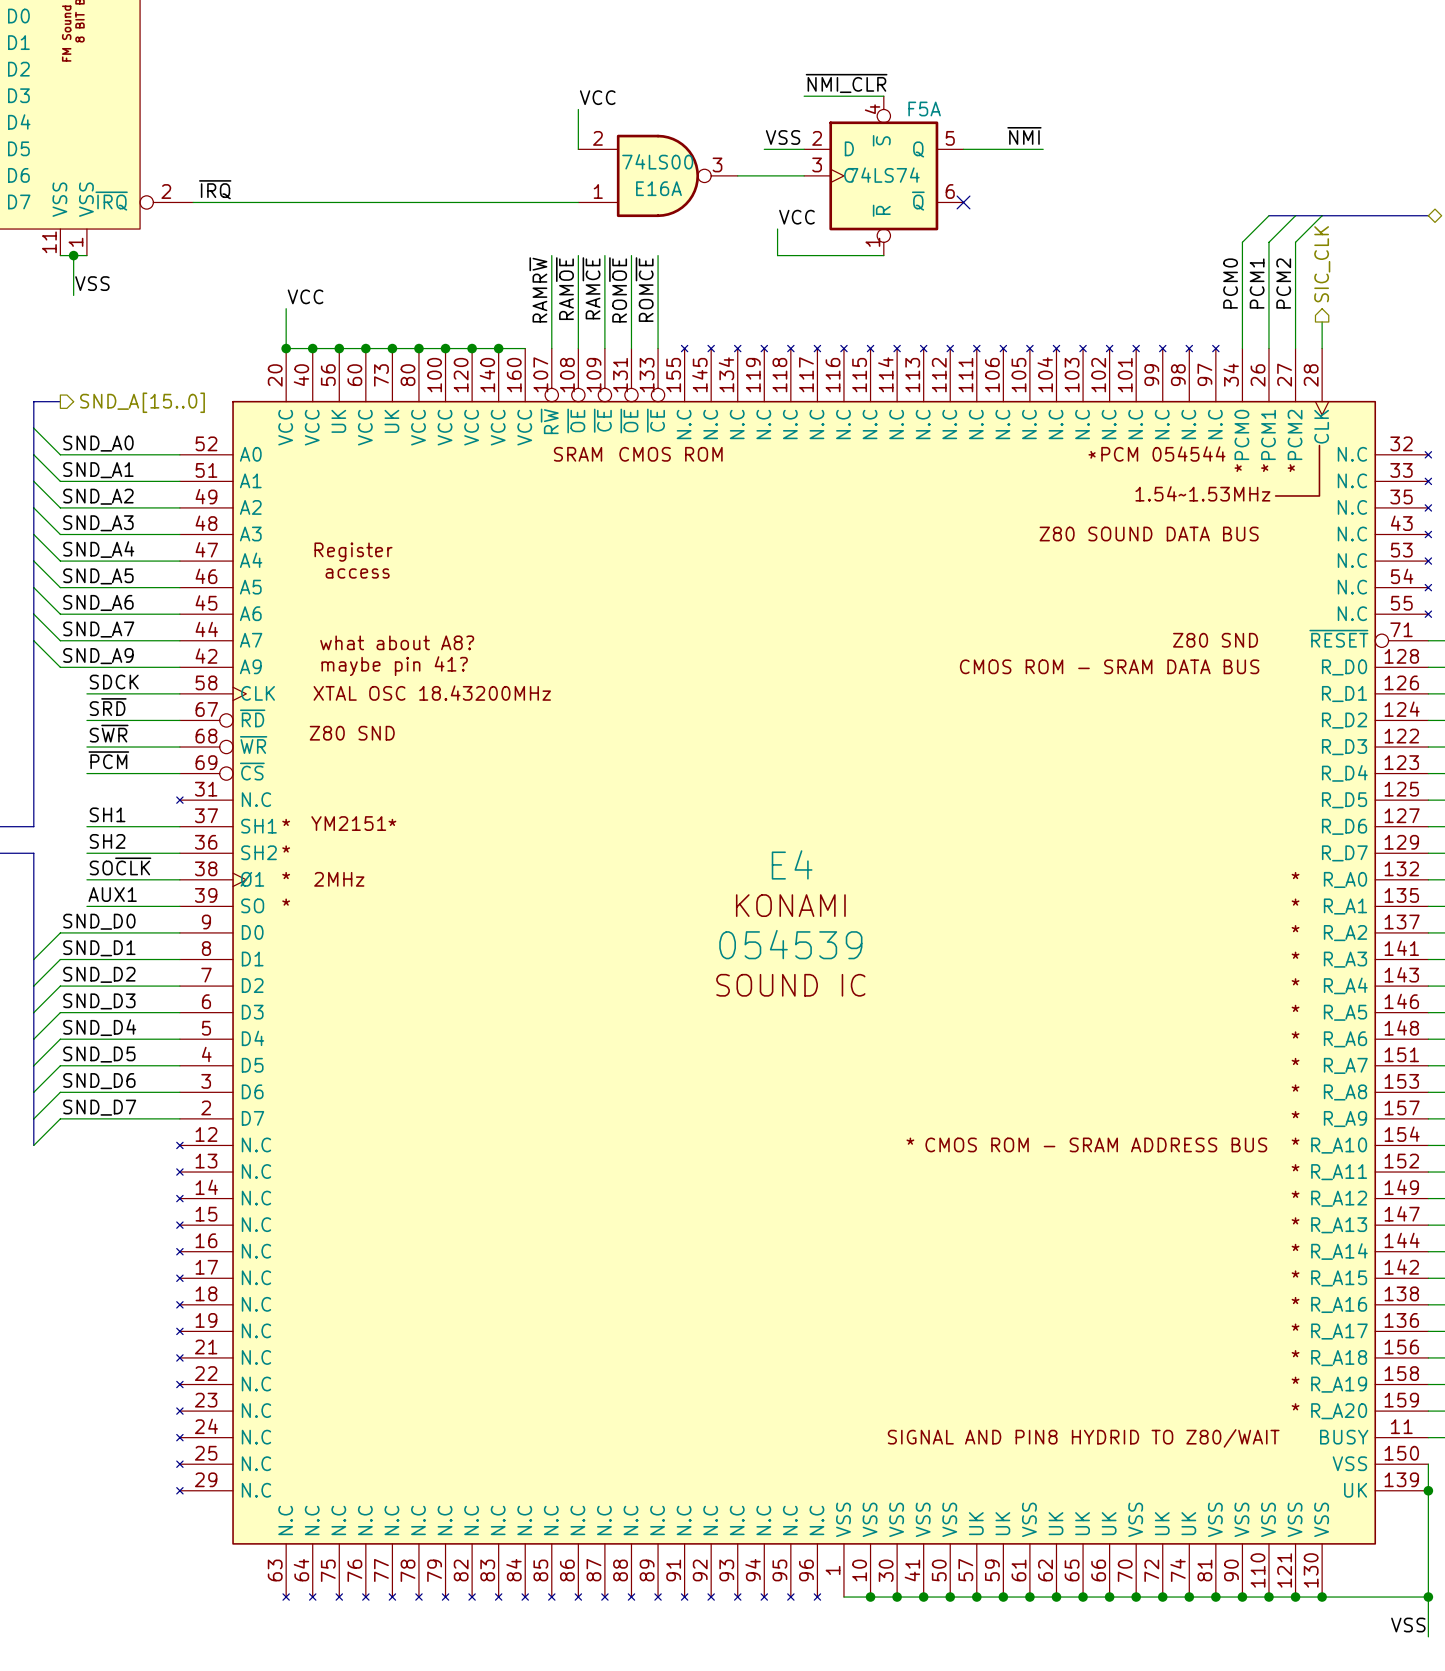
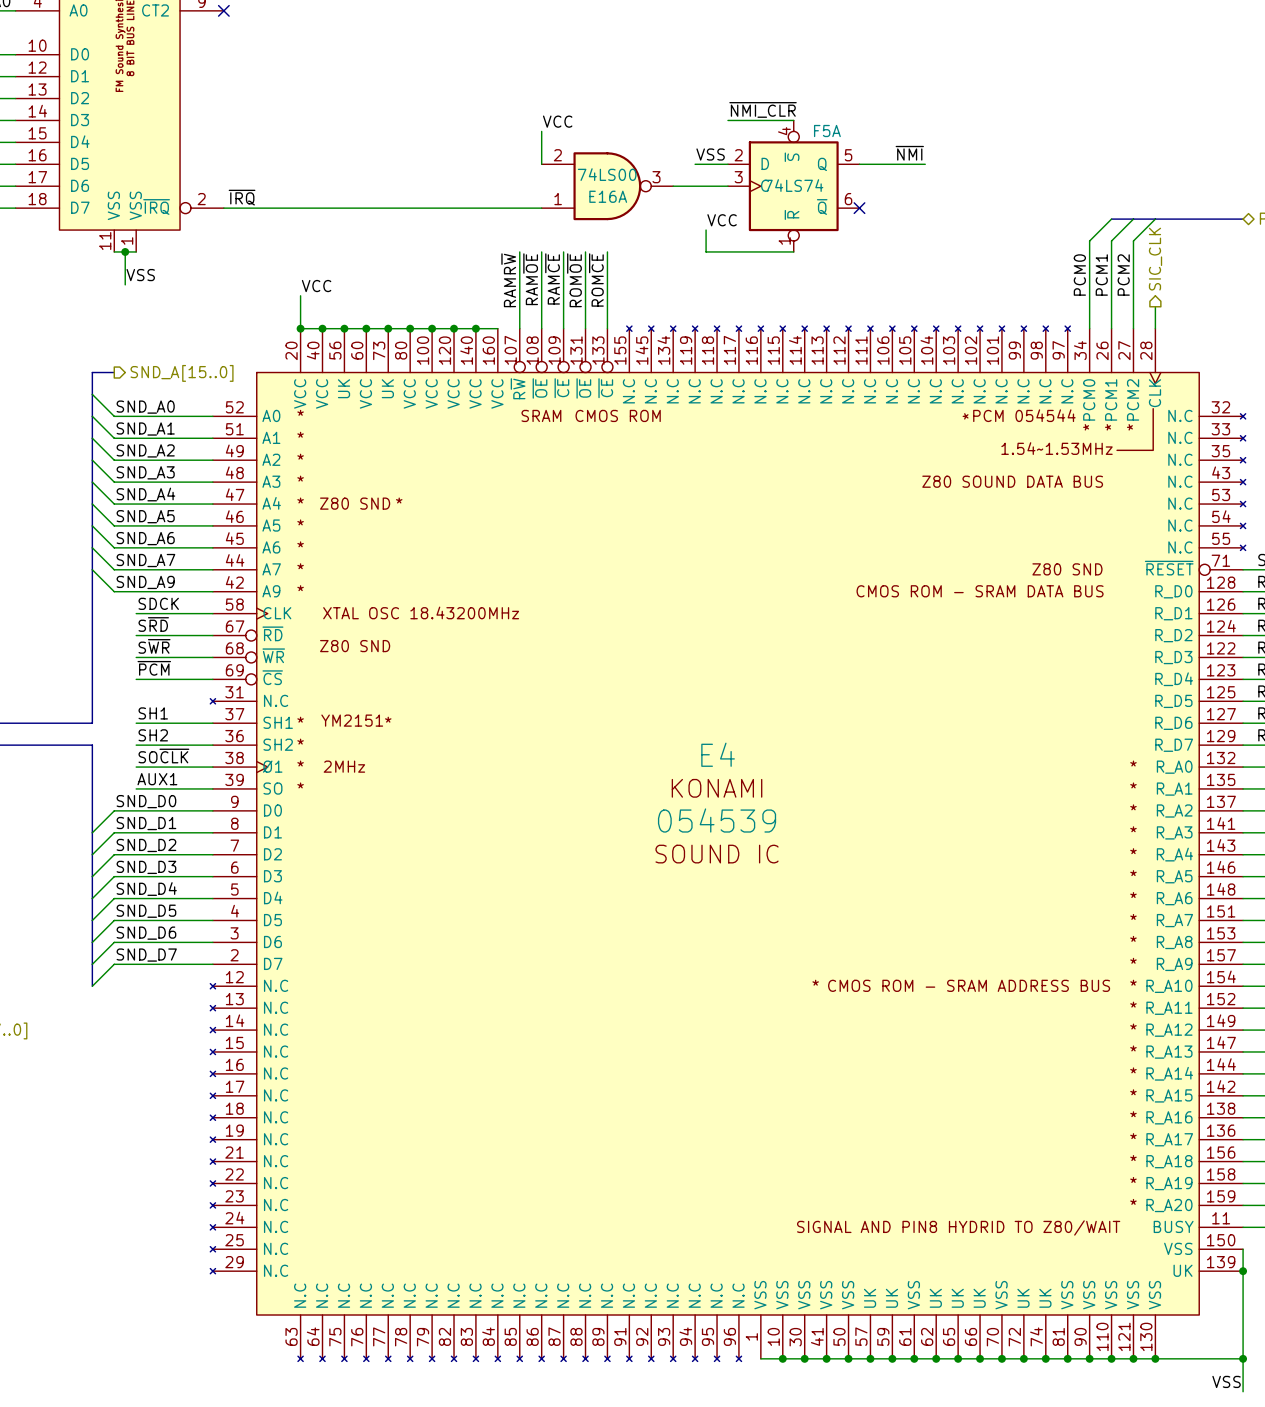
E4 symbol: [176, 345, 1432, 1601] -> [210, 326, 1246, 1362]

